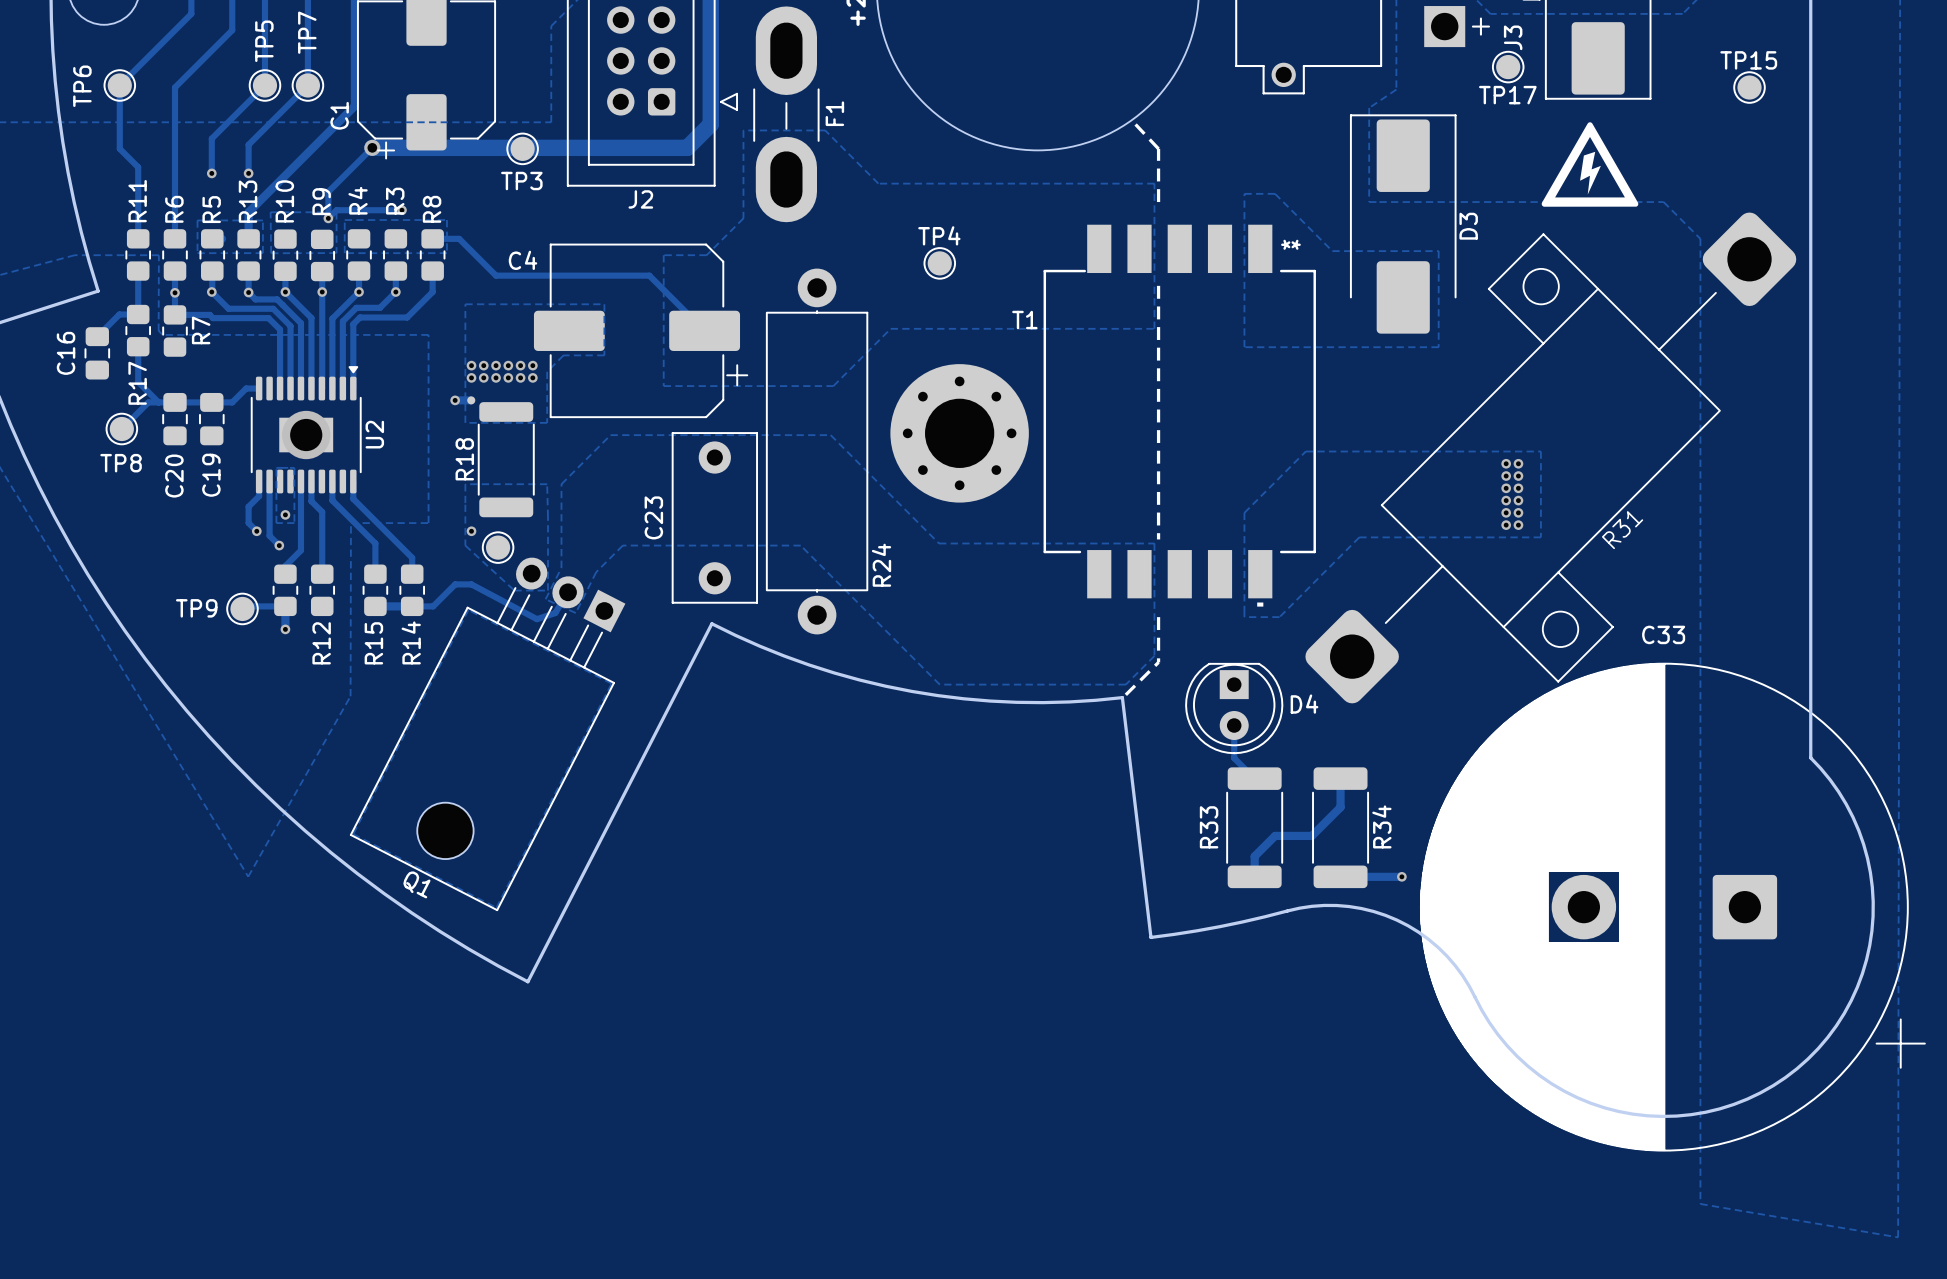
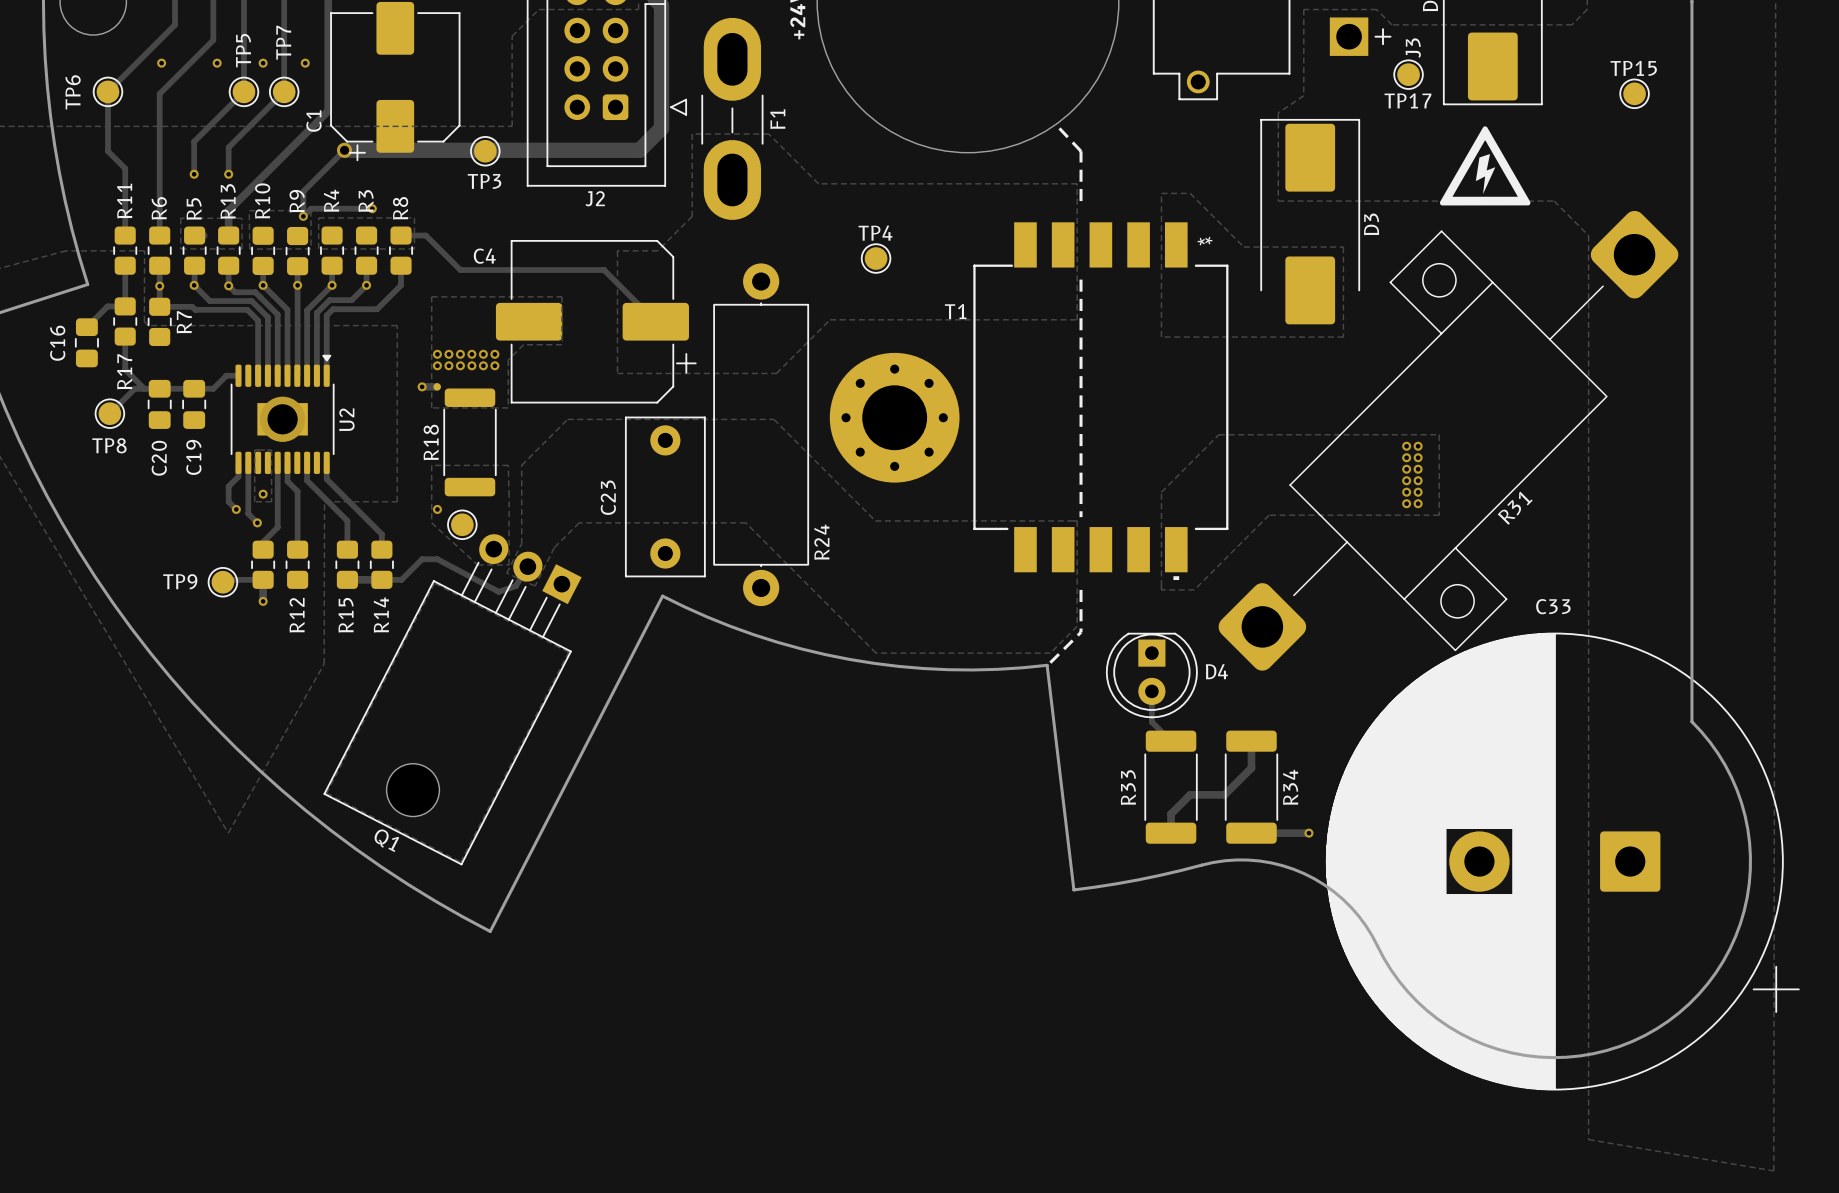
via: none -> (161, 63)
via: none -> (217, 63)
via: none -> (263, 63)
via: none -> (305, 63)

